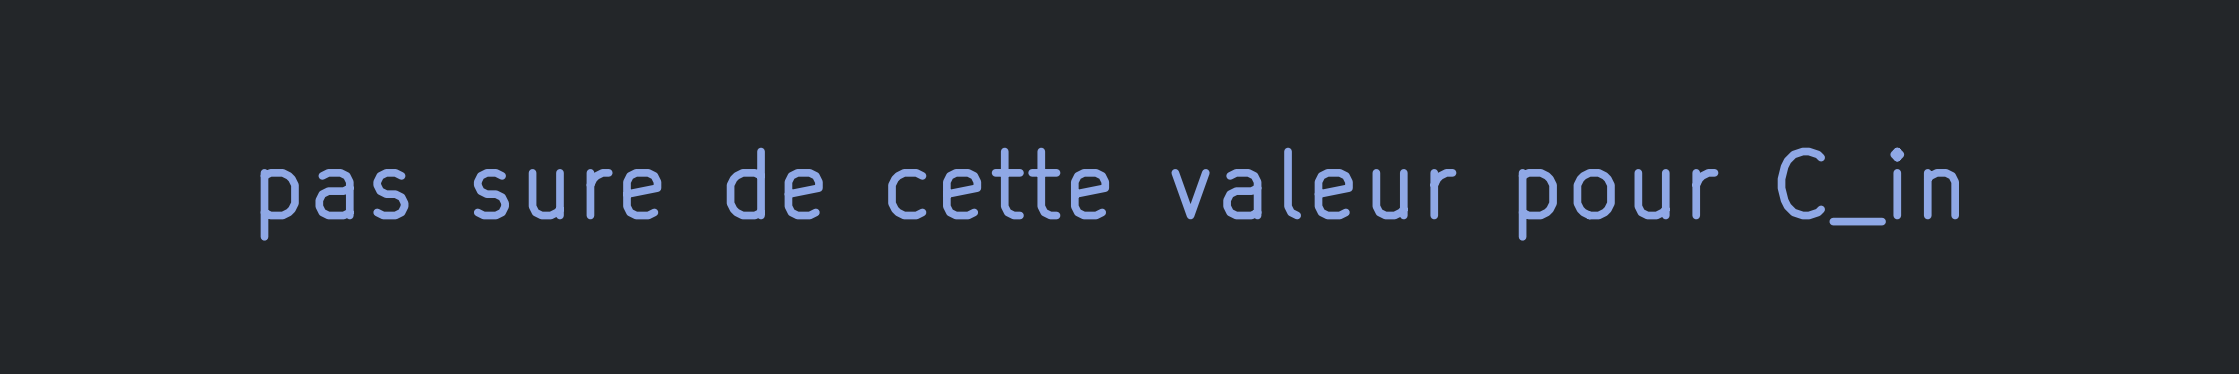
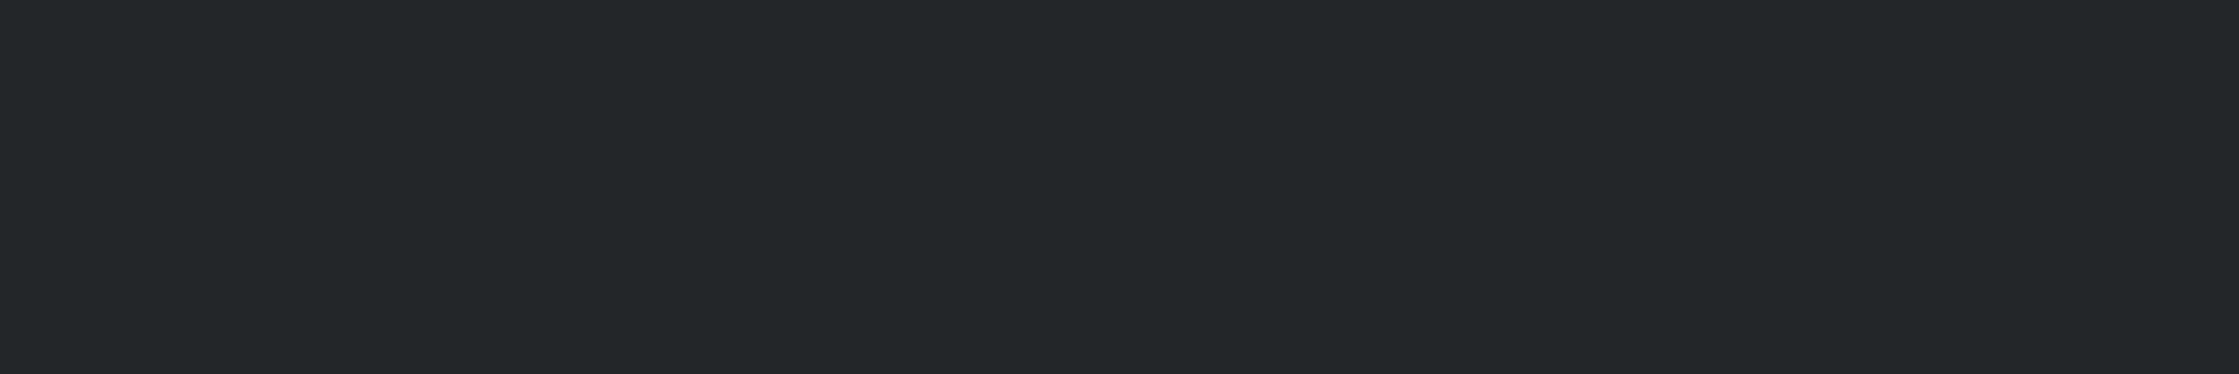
text: pas sure de cette valeur pour C_in (1109, 194) -> none

